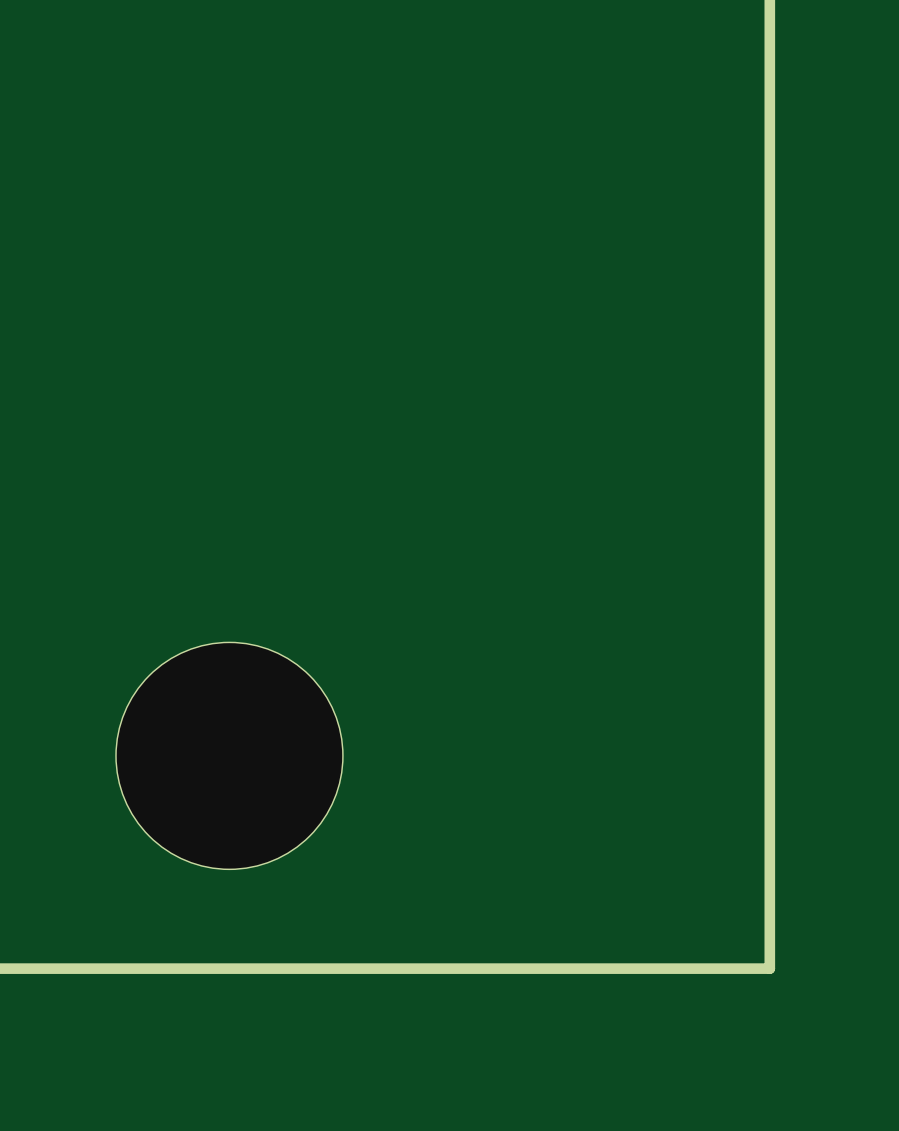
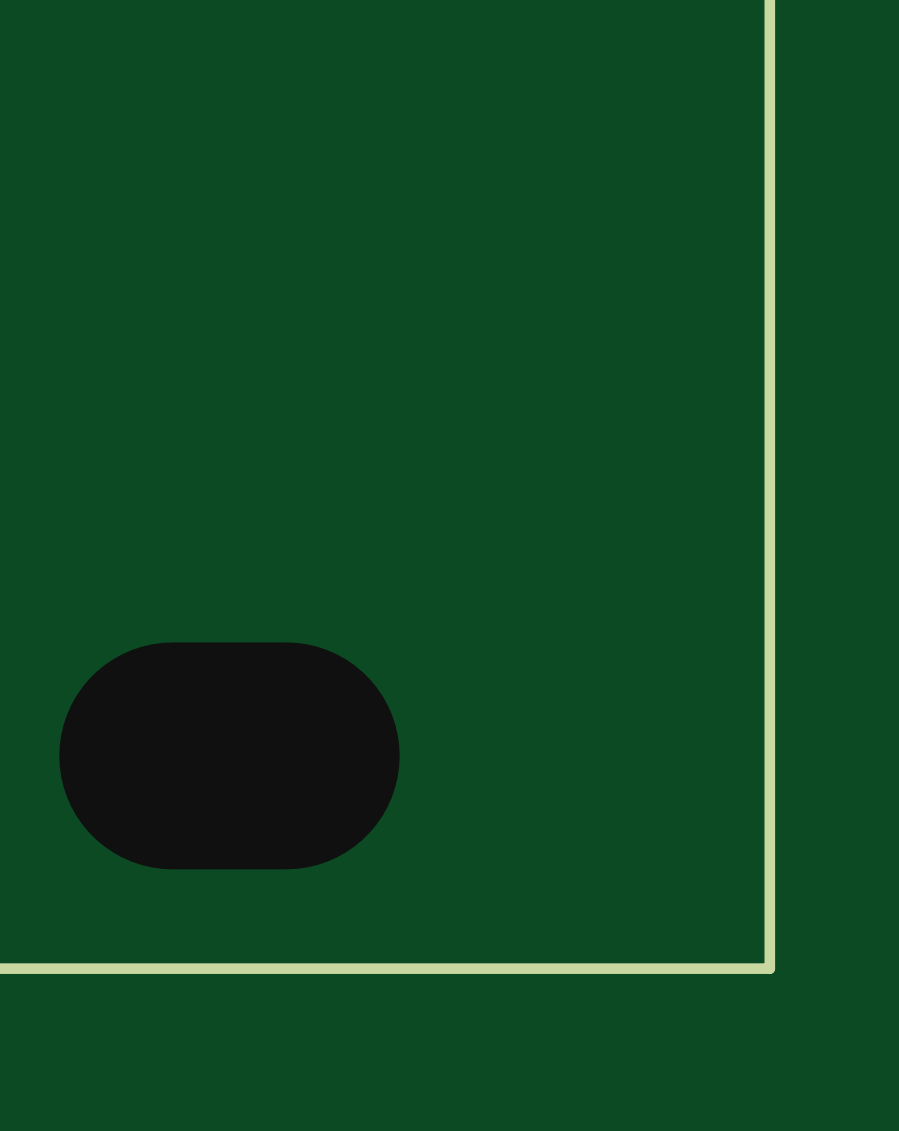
part footprint: [116, 642, 343, 870] -> [59, 642, 400, 870]

